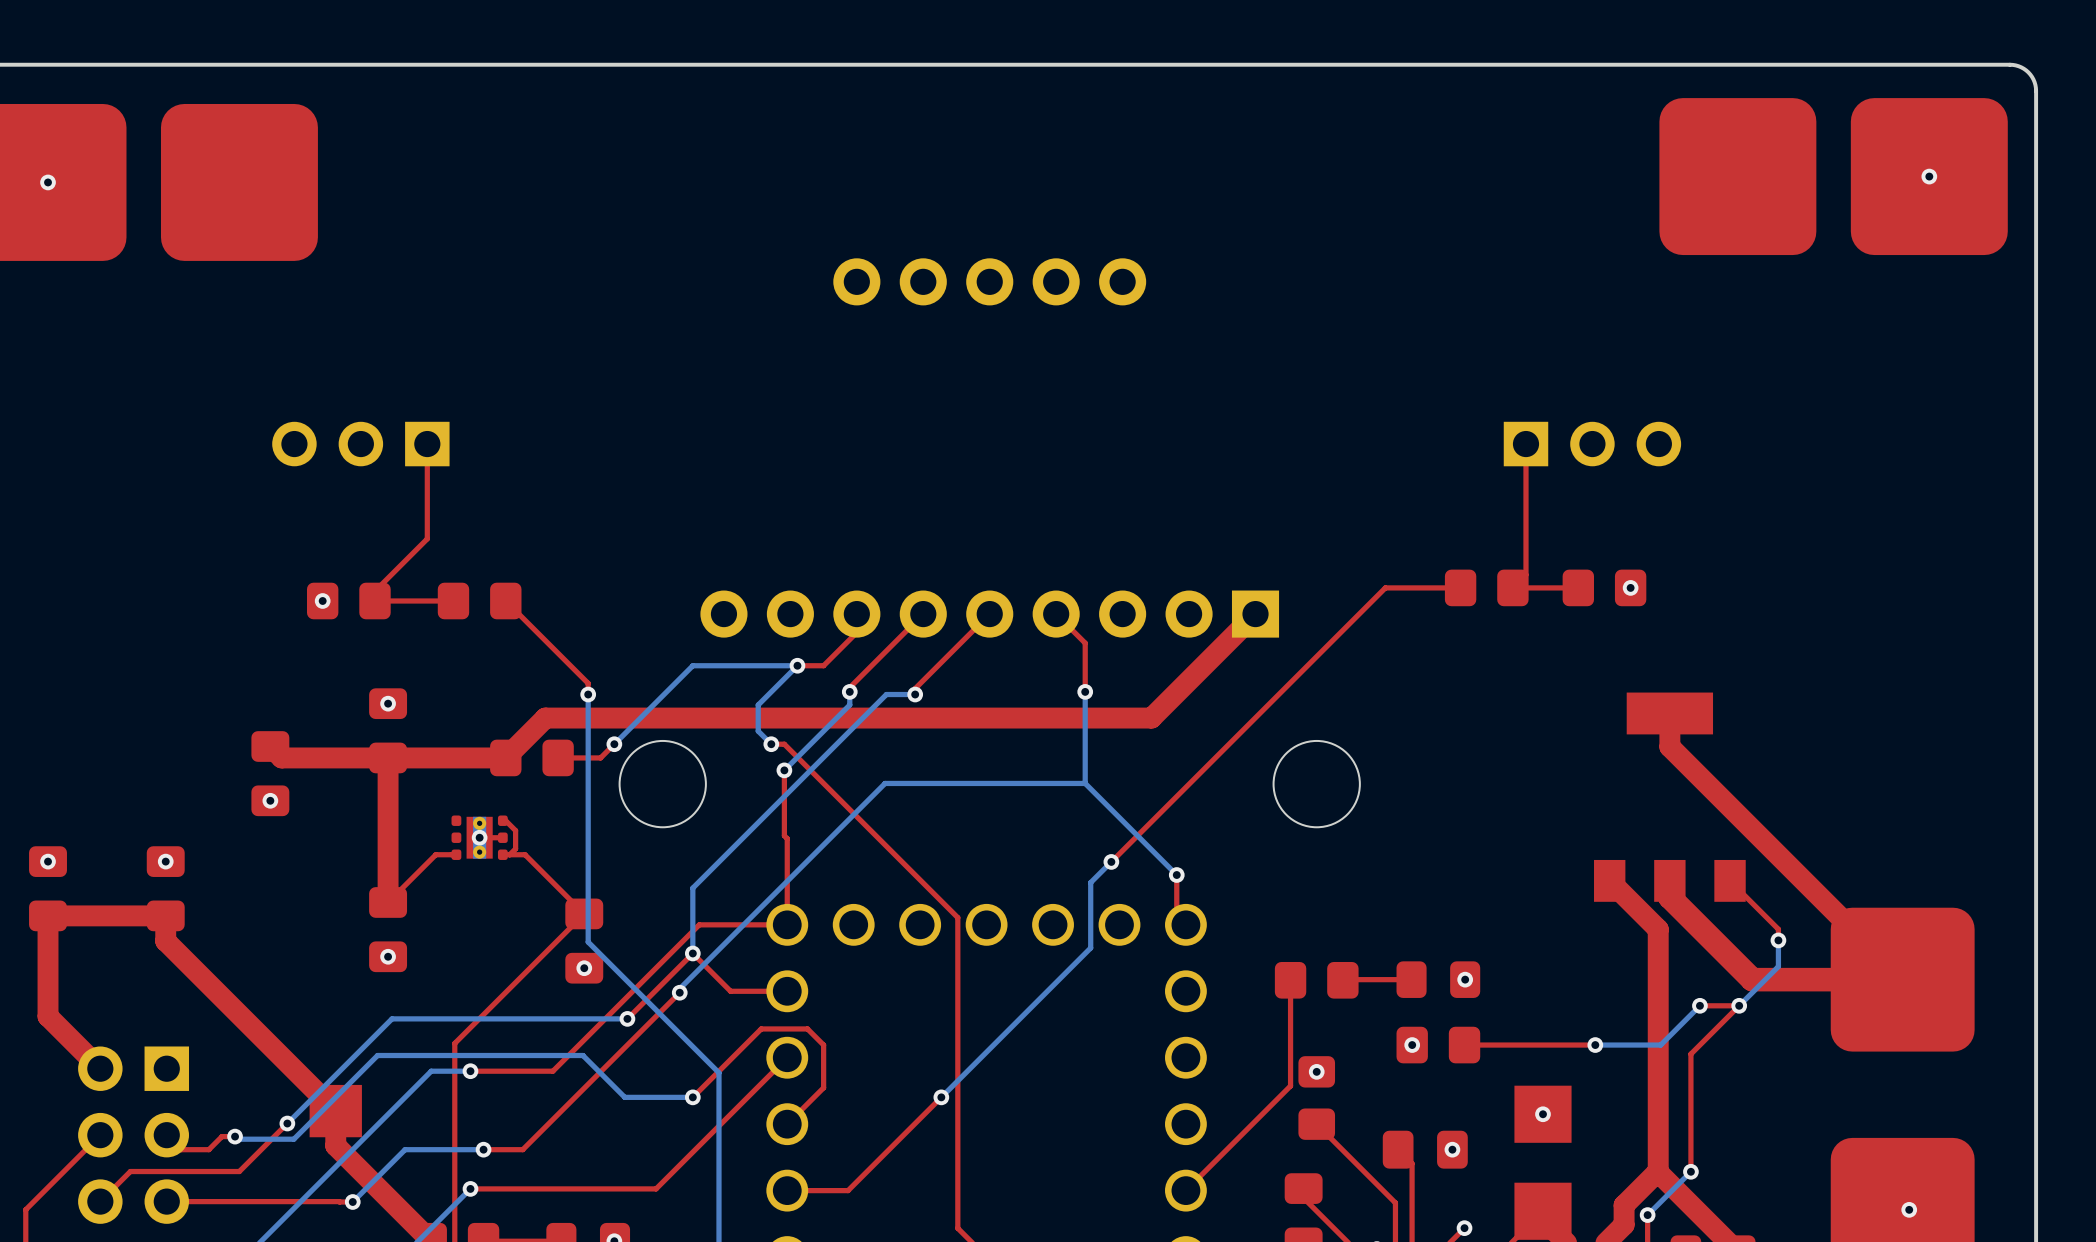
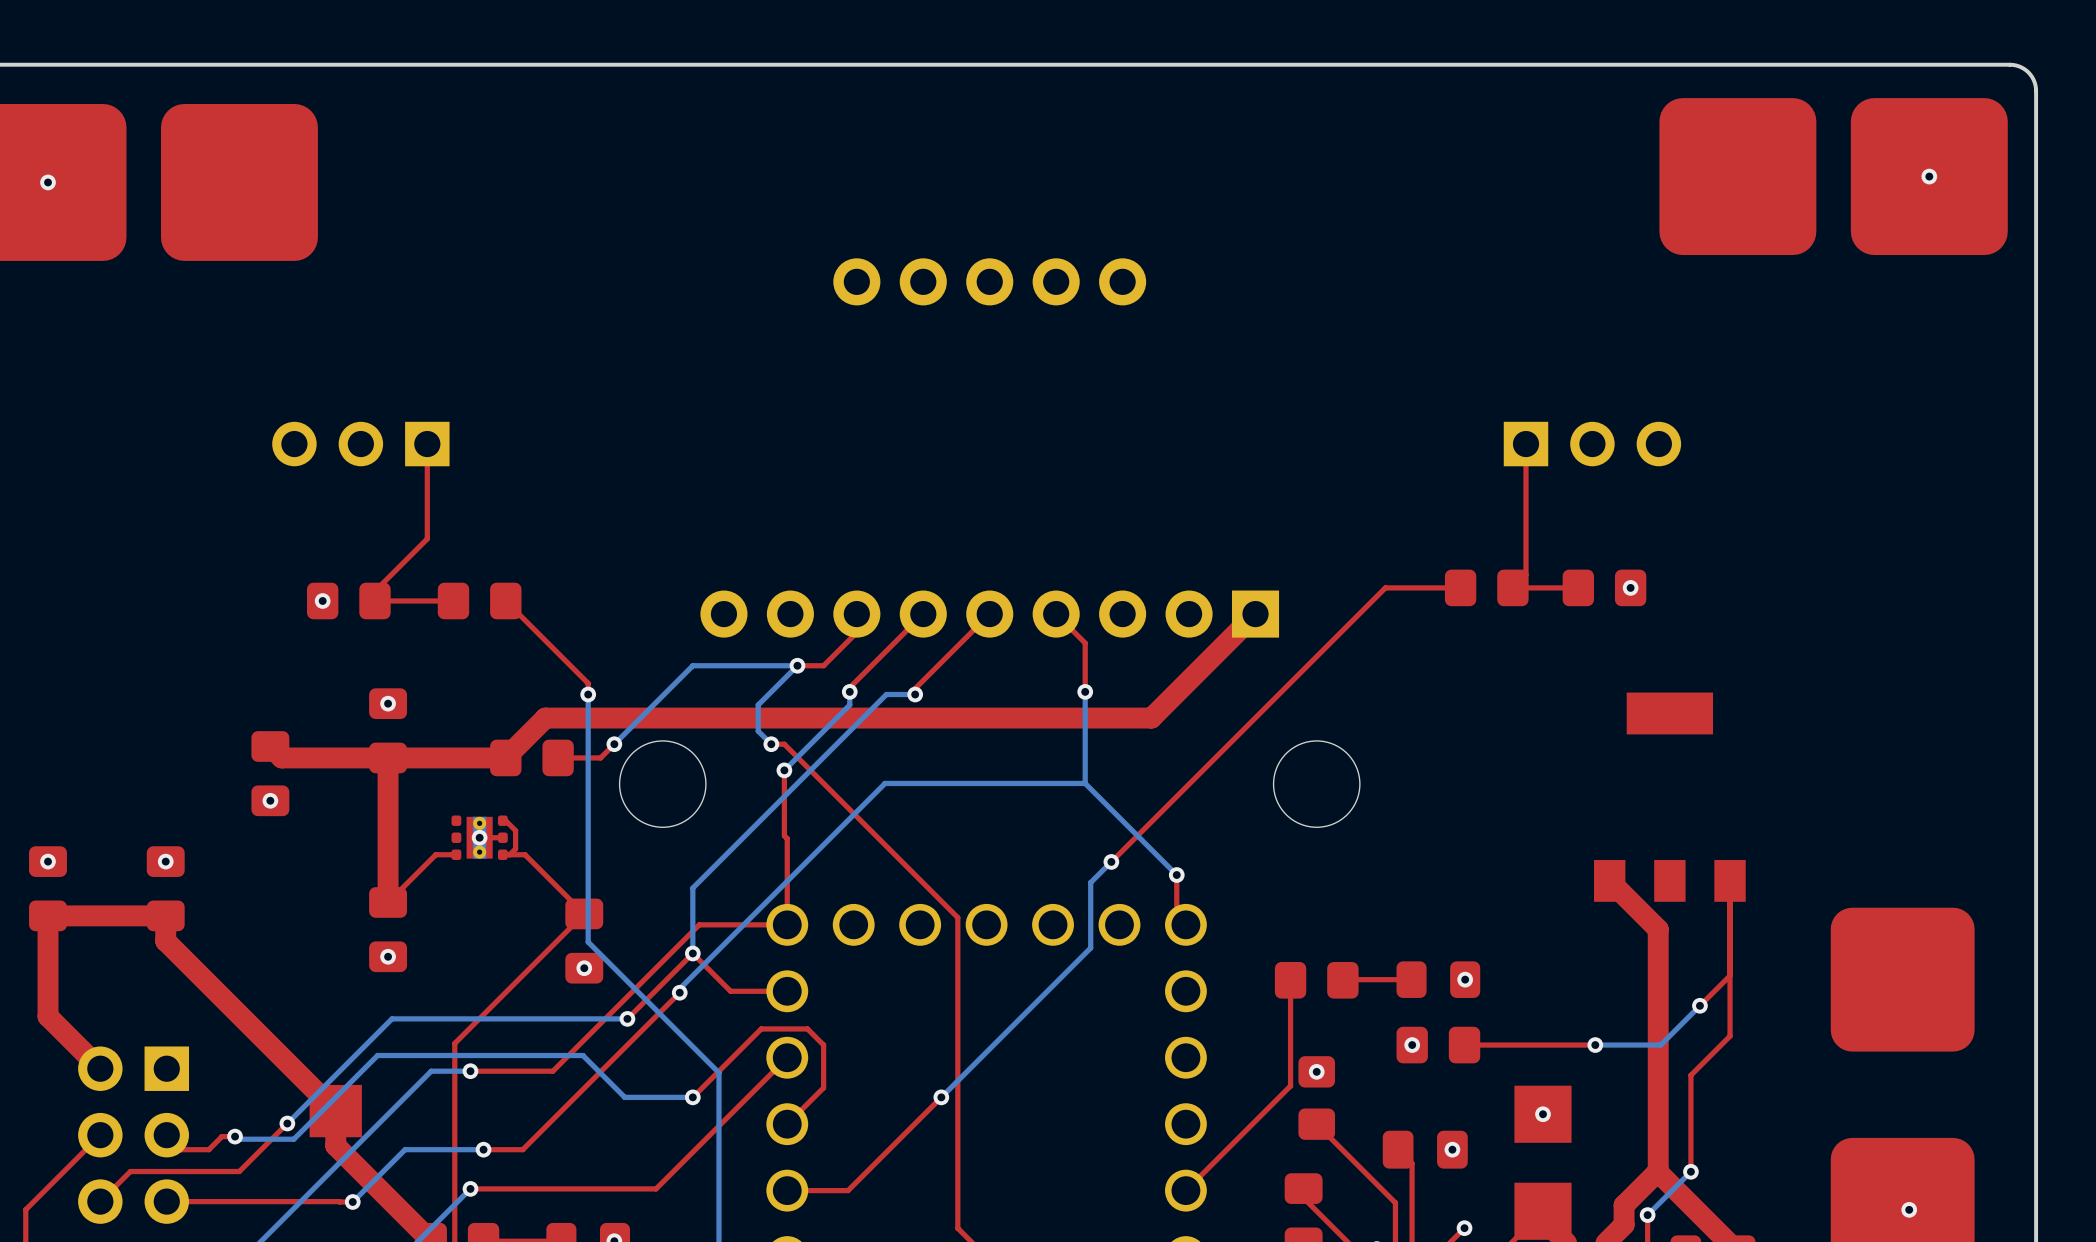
top track: (1669, 713) (1669, 746) (1902, 979) (1752, 979) (1669, 897) (1669, 880) -> none
top track: (1730, 880) (1778, 929) (1778, 940) -> none
top track: none -> (1730, 892) (1730, 1036) (1690, 1075)
bottom track: (1778, 940) (1778, 966) (1739, 1005) -> none
via: (1778, 940) -> none
top track: (1699, 1005) (1739, 1005) (1690, 1054) (1690, 1075) -> (1699, 1005) (1730, 975)
via: (1739, 1005) -> none

